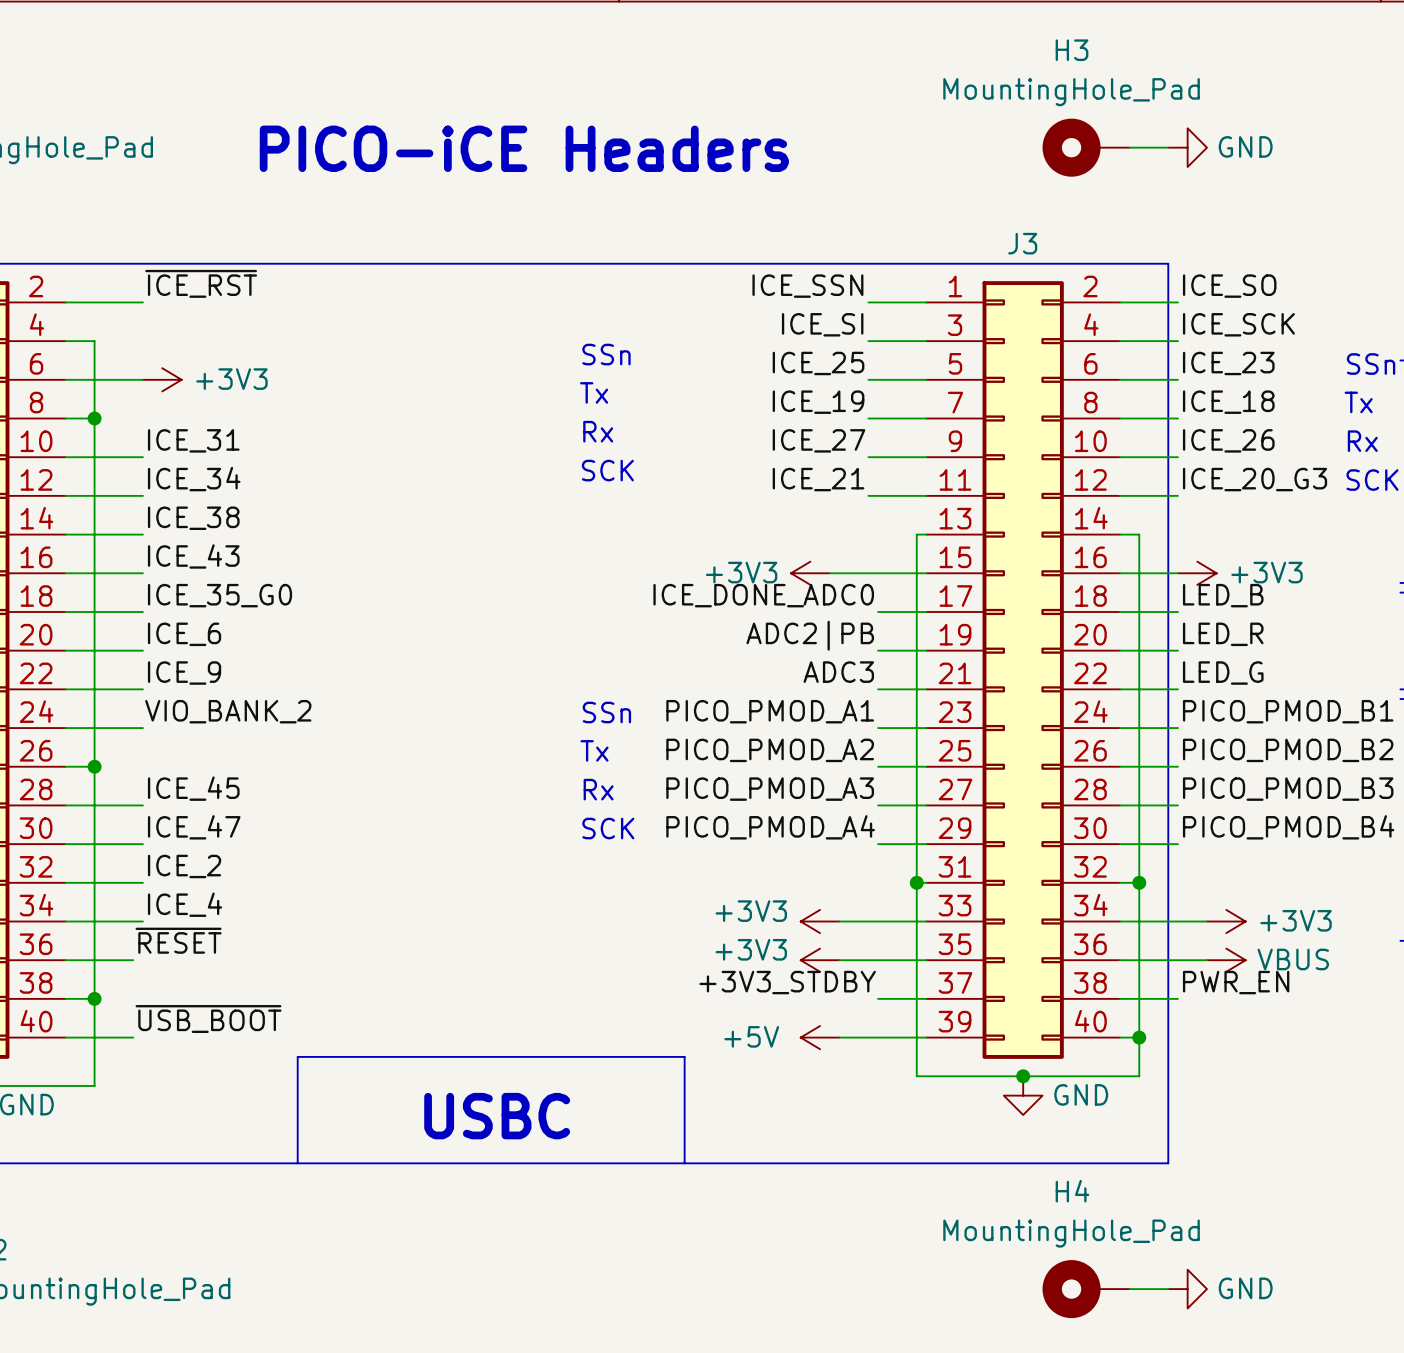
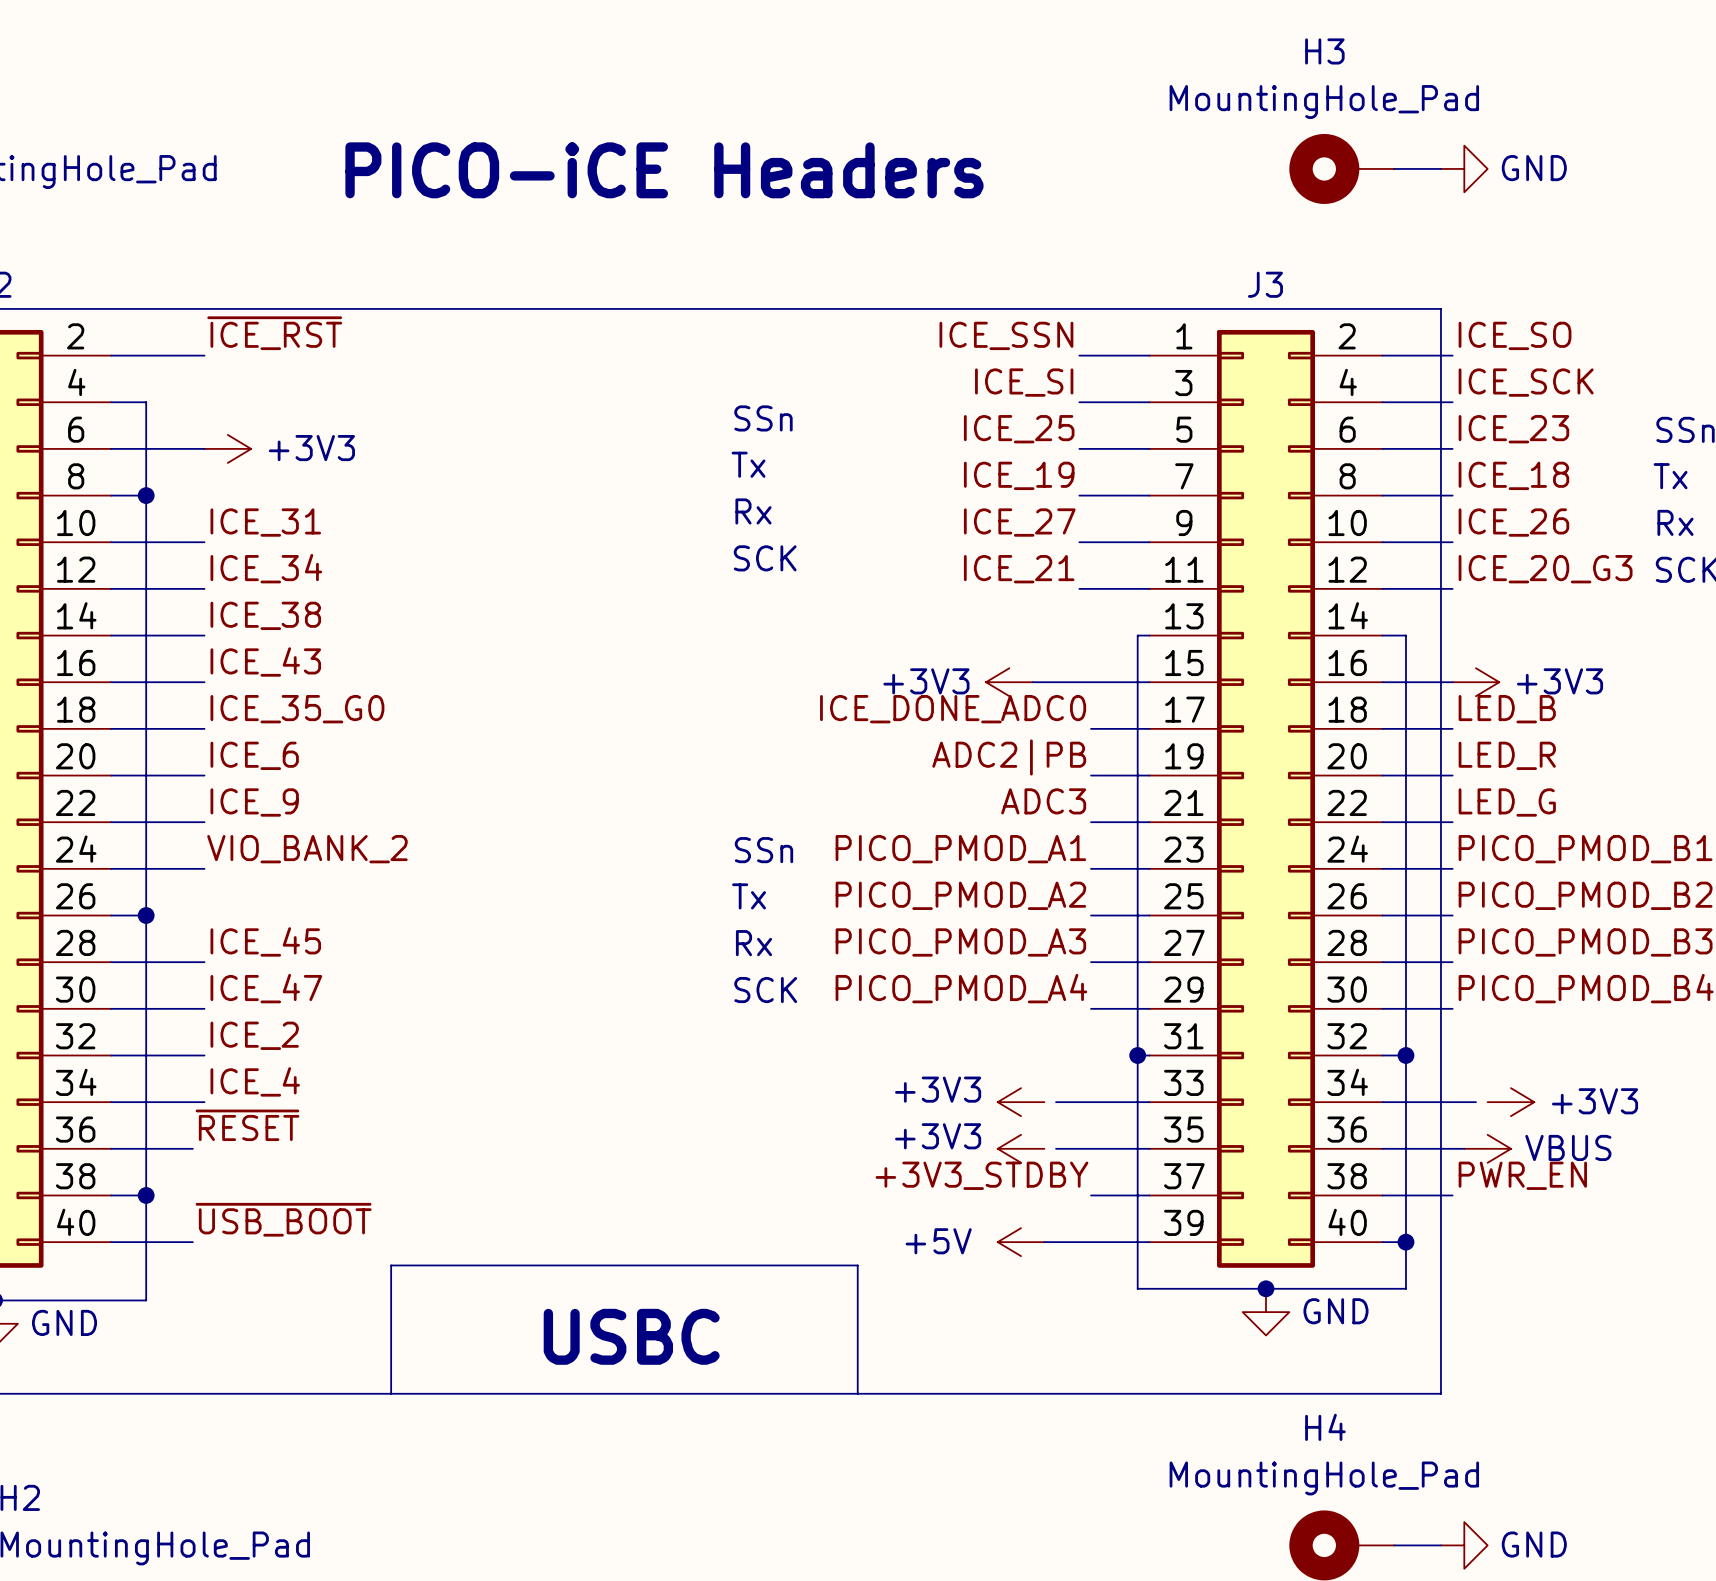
wire: (839, 921) (849, 921) -> none
wire: (1197, 921) (1206, 921) -> none
wire: (839, 960) (849, 960) -> none
power symbol position: VBUS (1226, 960) -> VBUS (1487, 1148)

